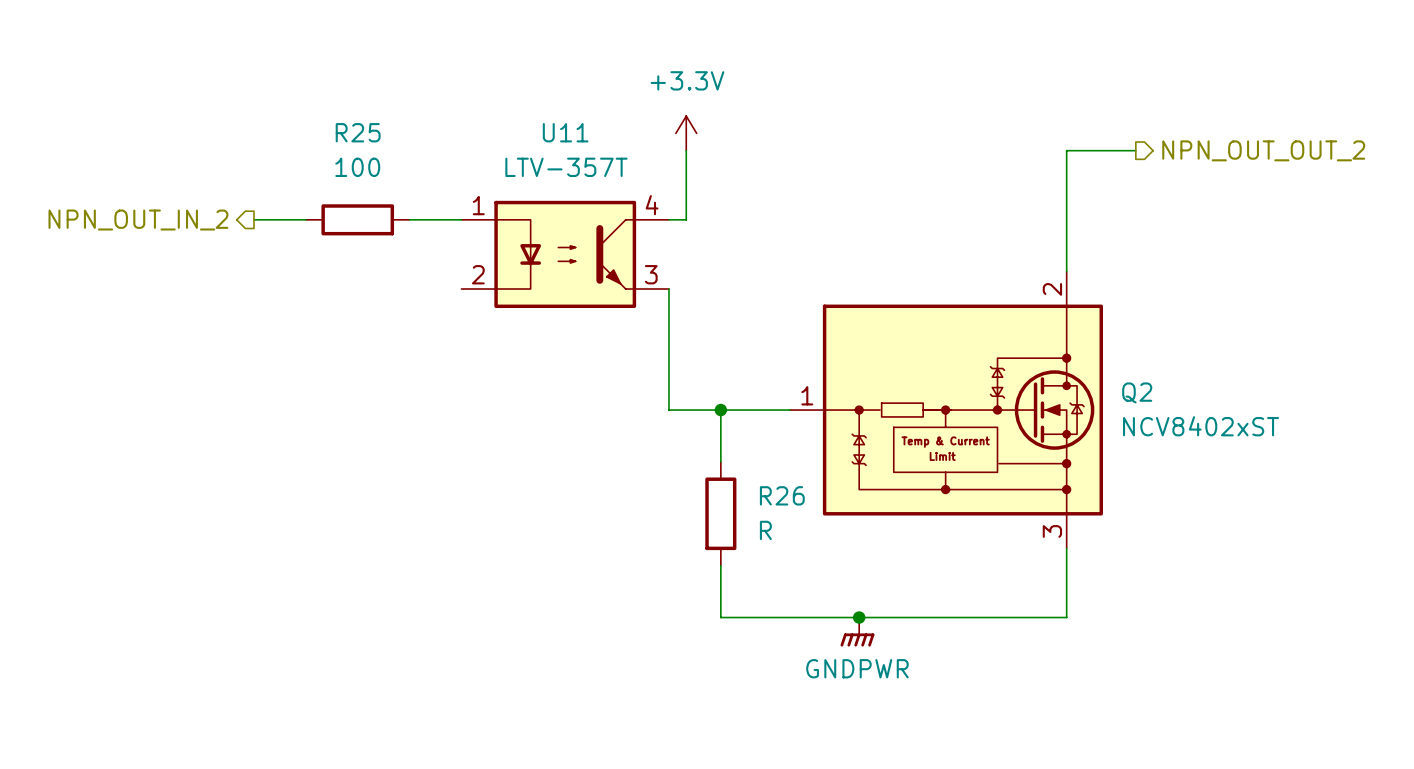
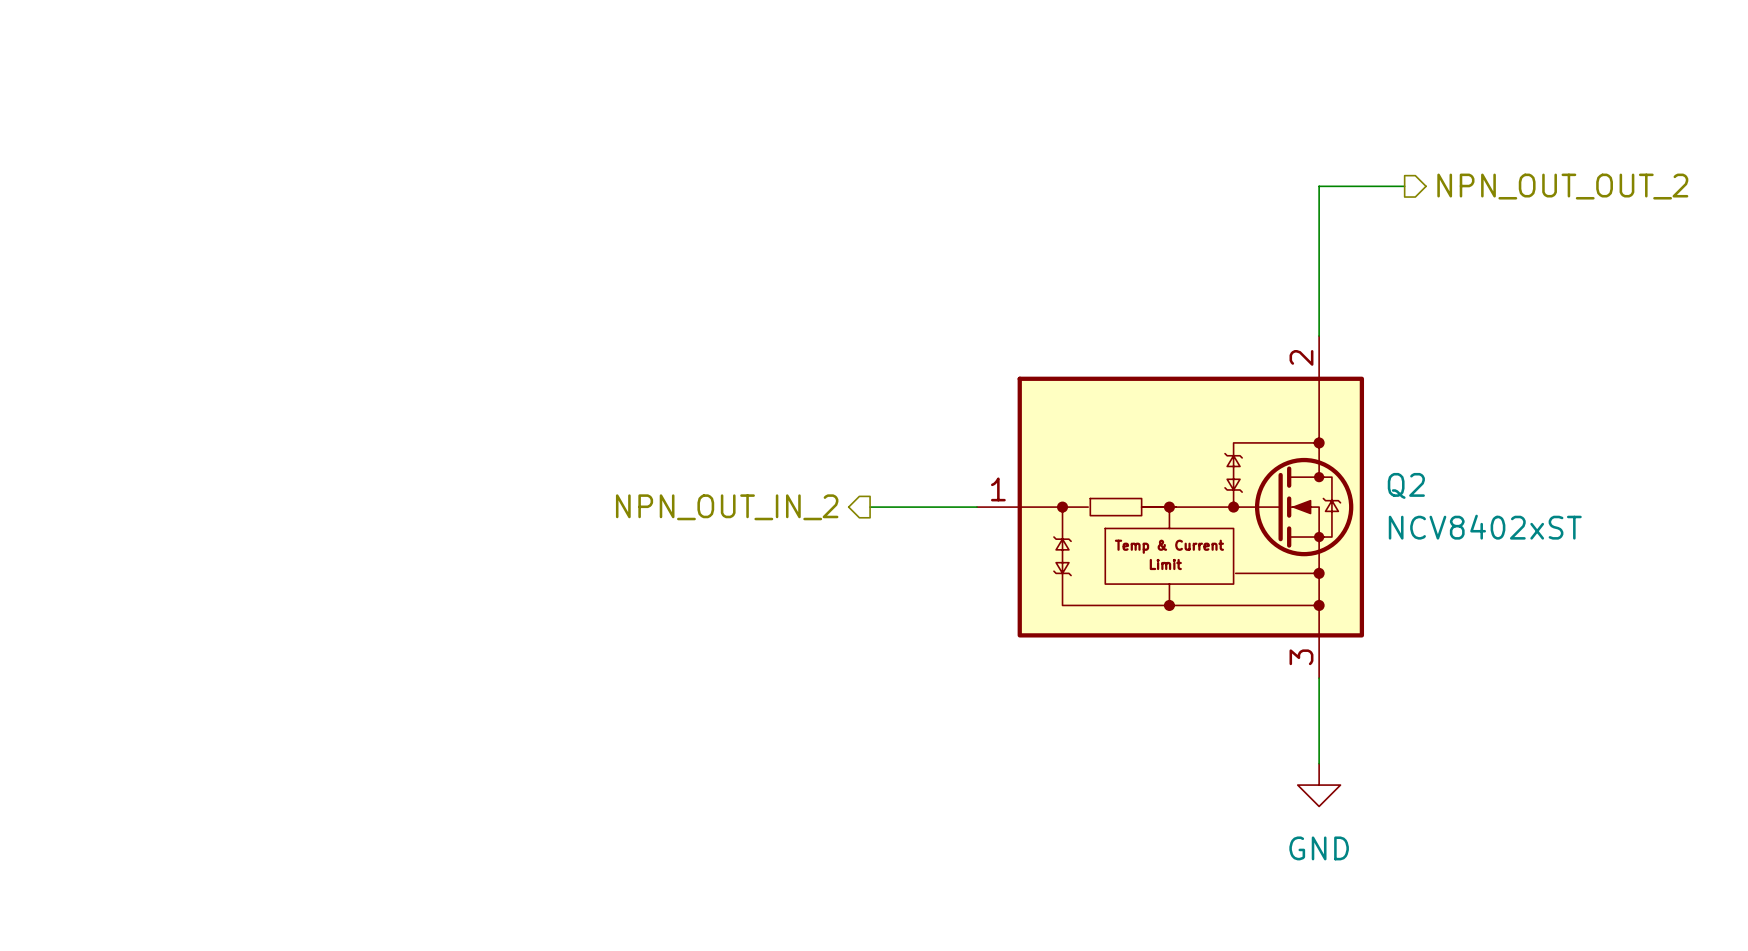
power symbol: +3.3V (686, 133) -> none
wire: (686, 150) (686, 219) (668, 219) -> none
wire: (253, 219) (305, 219) -> none
R25: 100 (357, 219) -> none
wire: (409, 219) (461, 219) -> none
hierarchical label: NPN_OUT_IN_2 (138, 220) -> none
U11: LTV-357T (565, 254) -> none
wire: (668, 289) (668, 410) (703, 410) -> none
hierarchical label: none -> NPN_OUT_IN_2 (727, 507)
wire: (720, 410) (720, 461) -> none
junction: (720, 410) -> none
R26: R (720, 513) -> none
wire: (720, 565) (720, 617) (1066, 617) -> none
junction: (859, 617) -> none
power symbol: GNDPWR (857, 632) -> none
power symbol: none -> GND (1319, 785)

